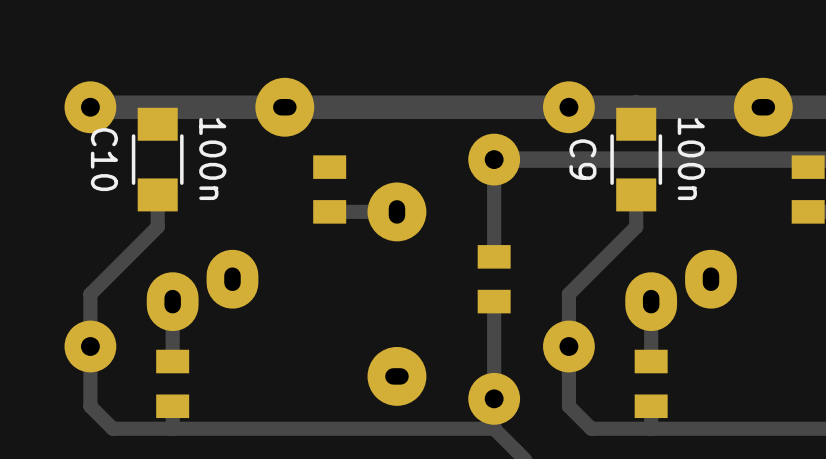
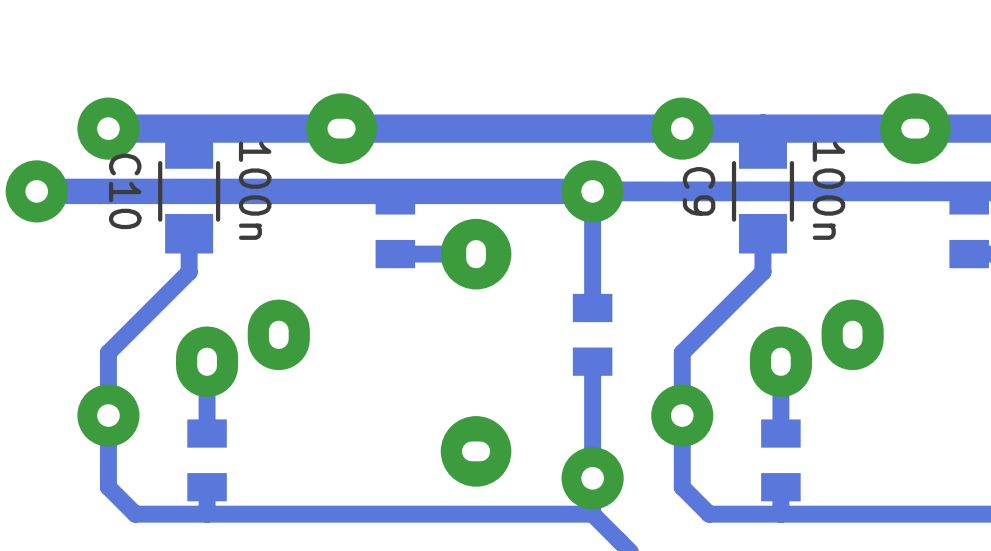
via: none -> (36, 191)
track: none -> (592, 191) (36, 191)

